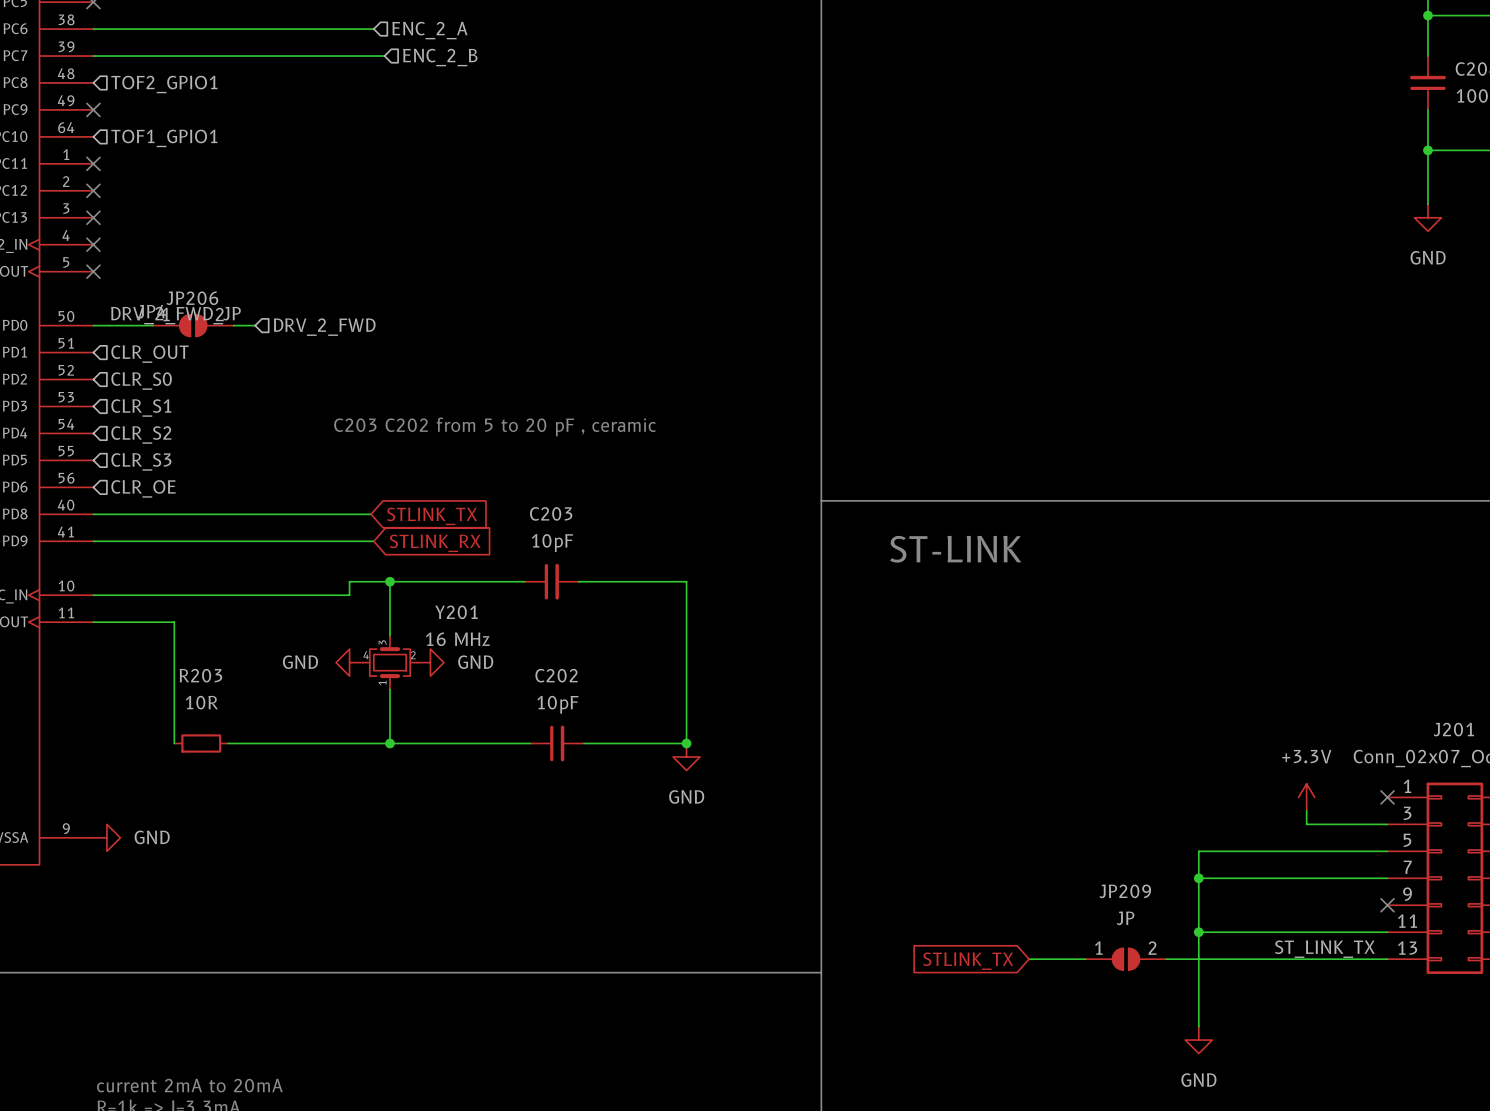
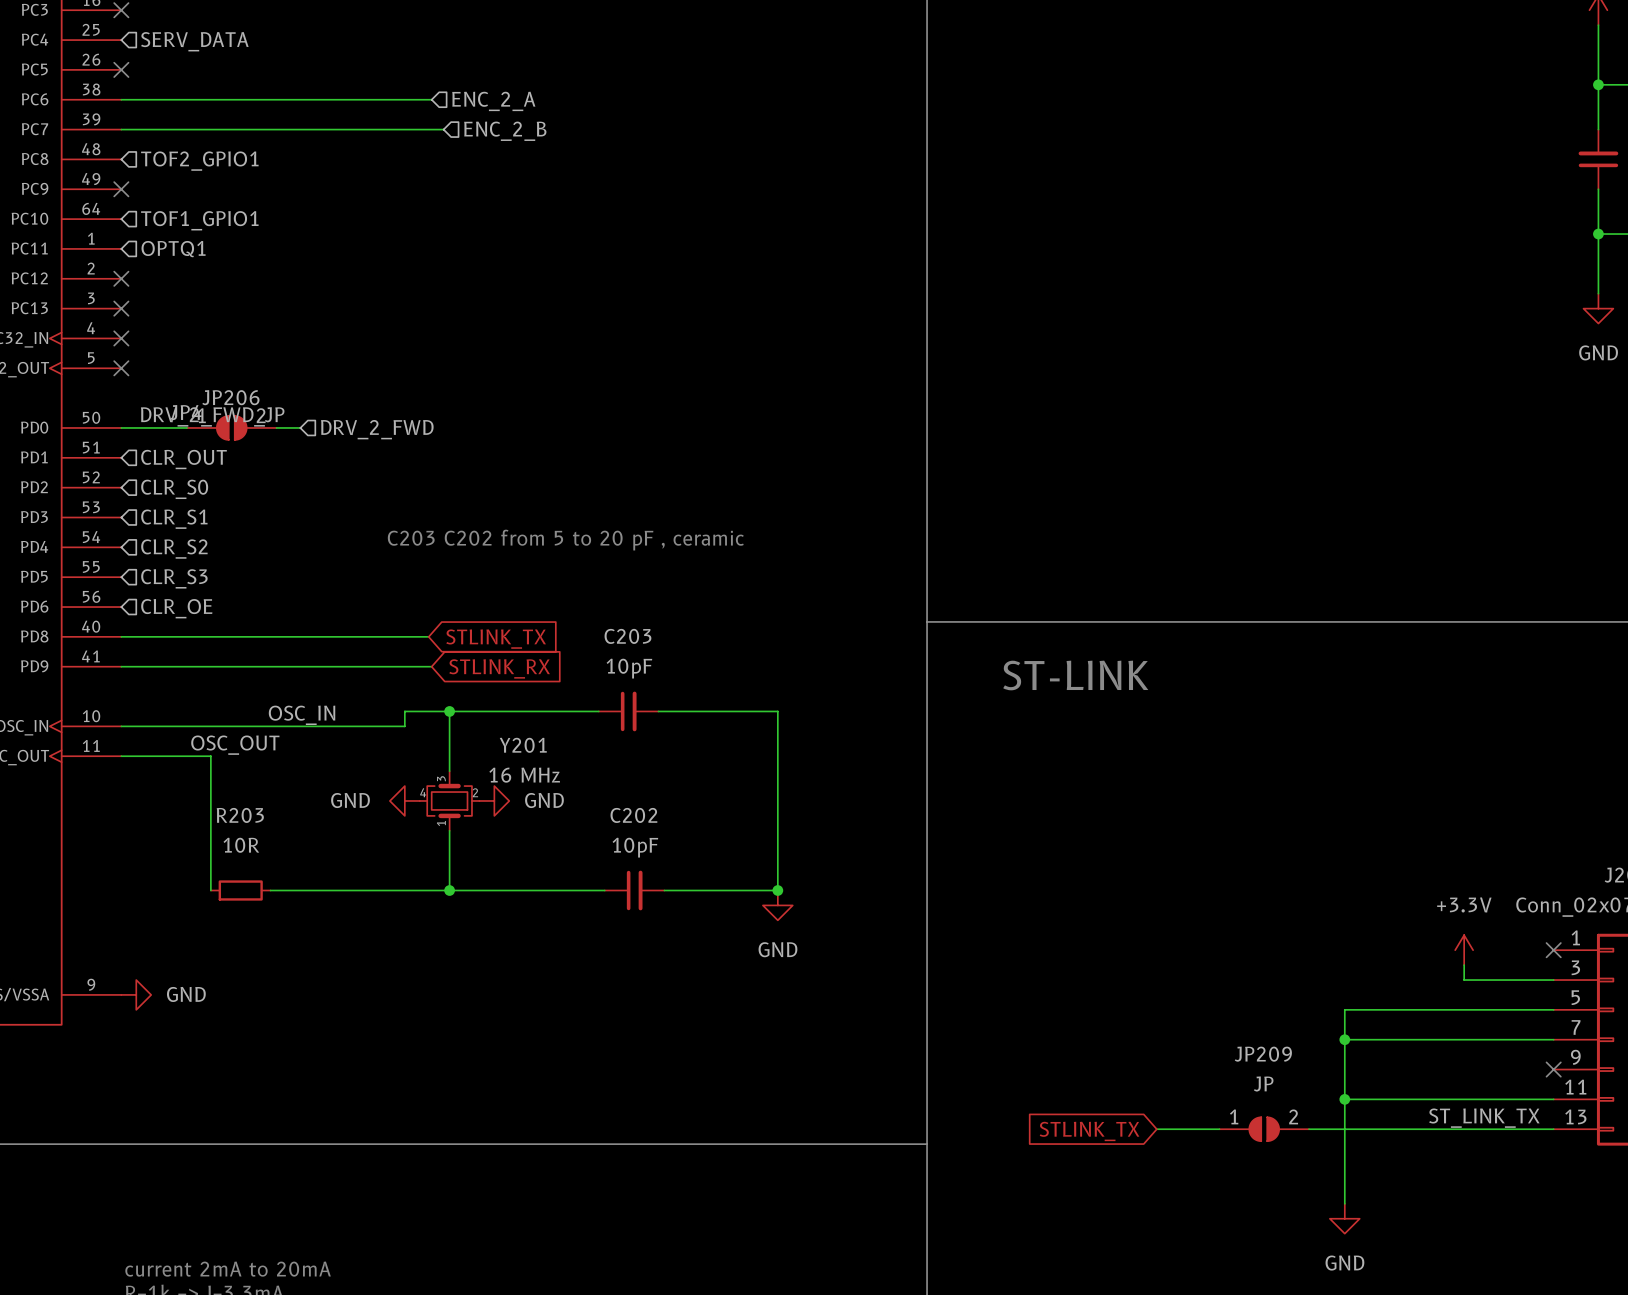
no-connect mark: (93, 163) -> none
hierarchical label: none -> OPTQ1 (173, 249)
label: none -> OSC_IN (302, 715)
label: none -> OSC_OUT (235, 745)

